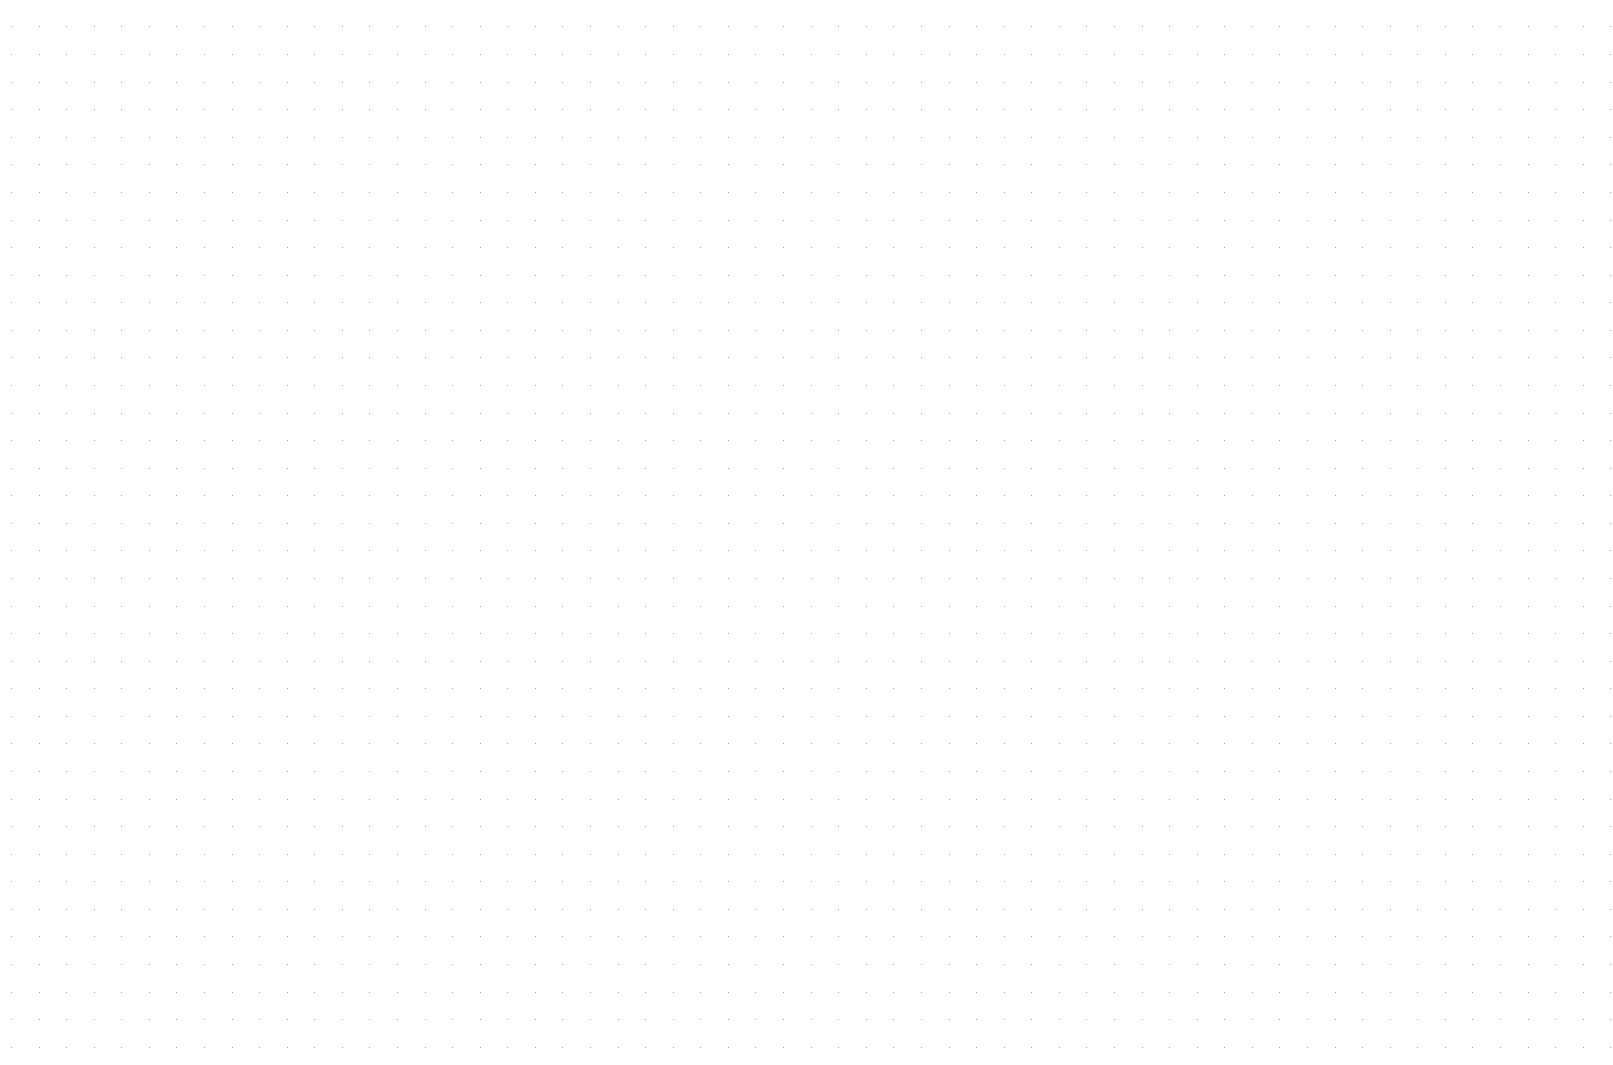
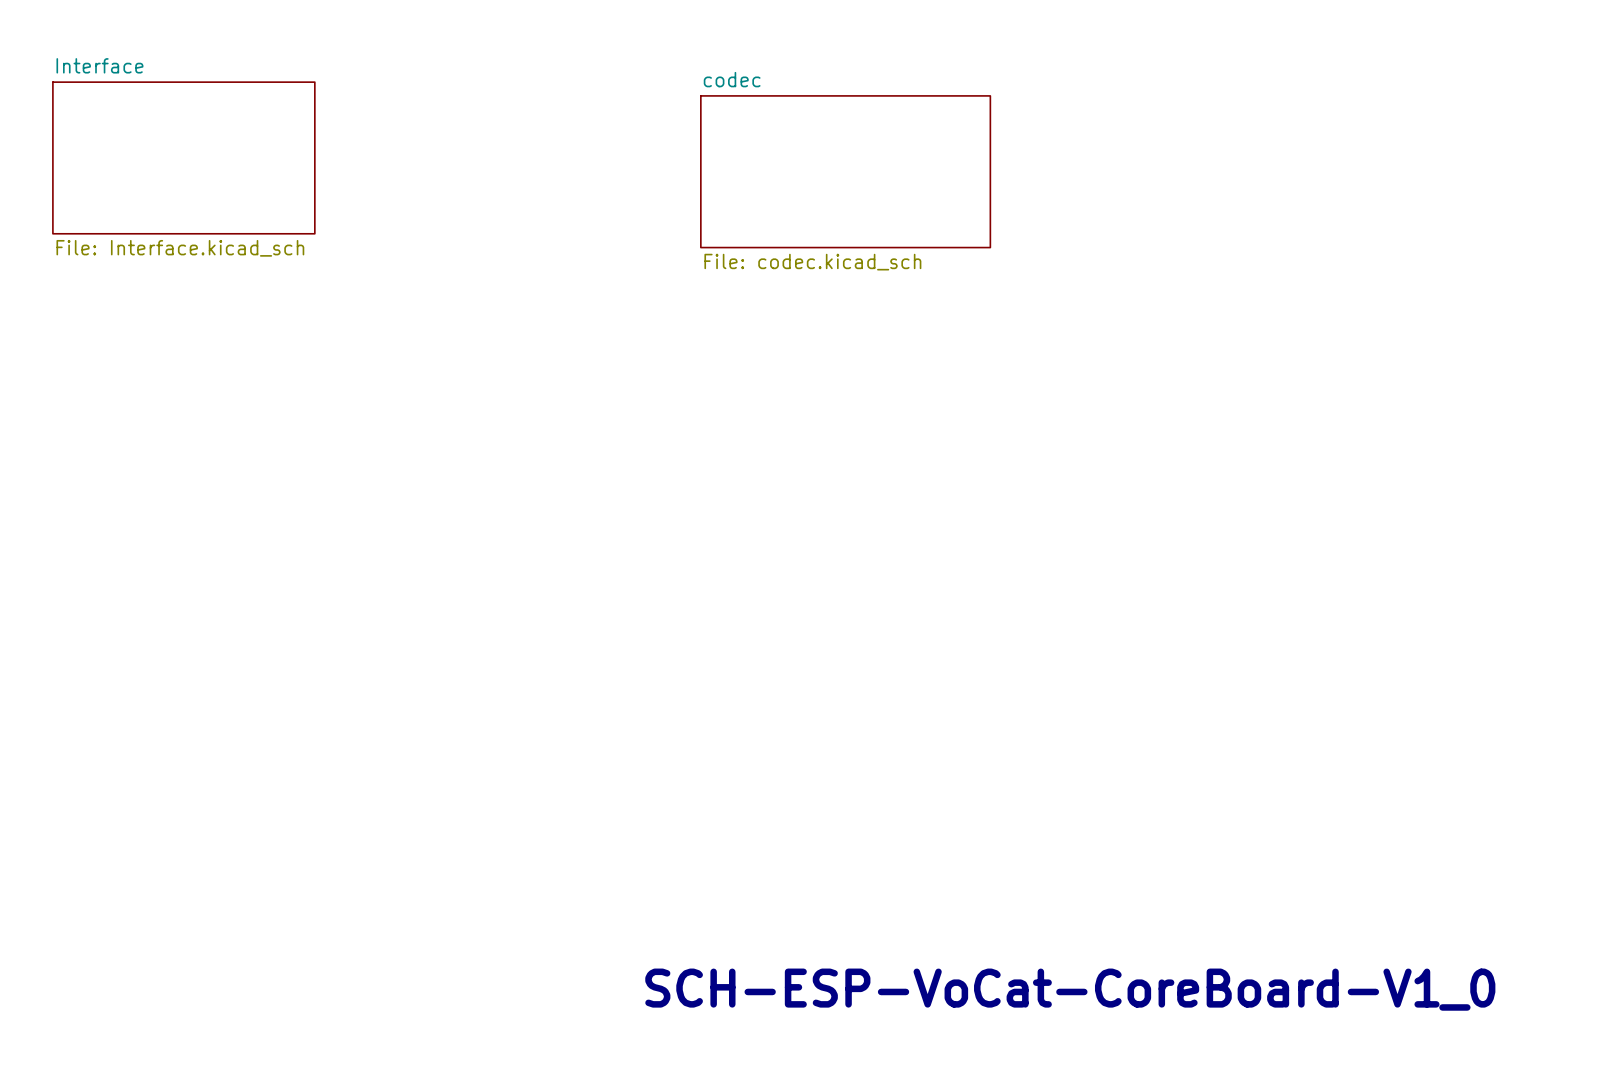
sheet Interface: none -> File: Interface.kicad_sch (183, 157)
sheet codec: none -> File: codec.kicad_sch (845, 171)
text: none -> SCH-ESP-VoCat-CoreBoard-V1_0 (1070, 989)

